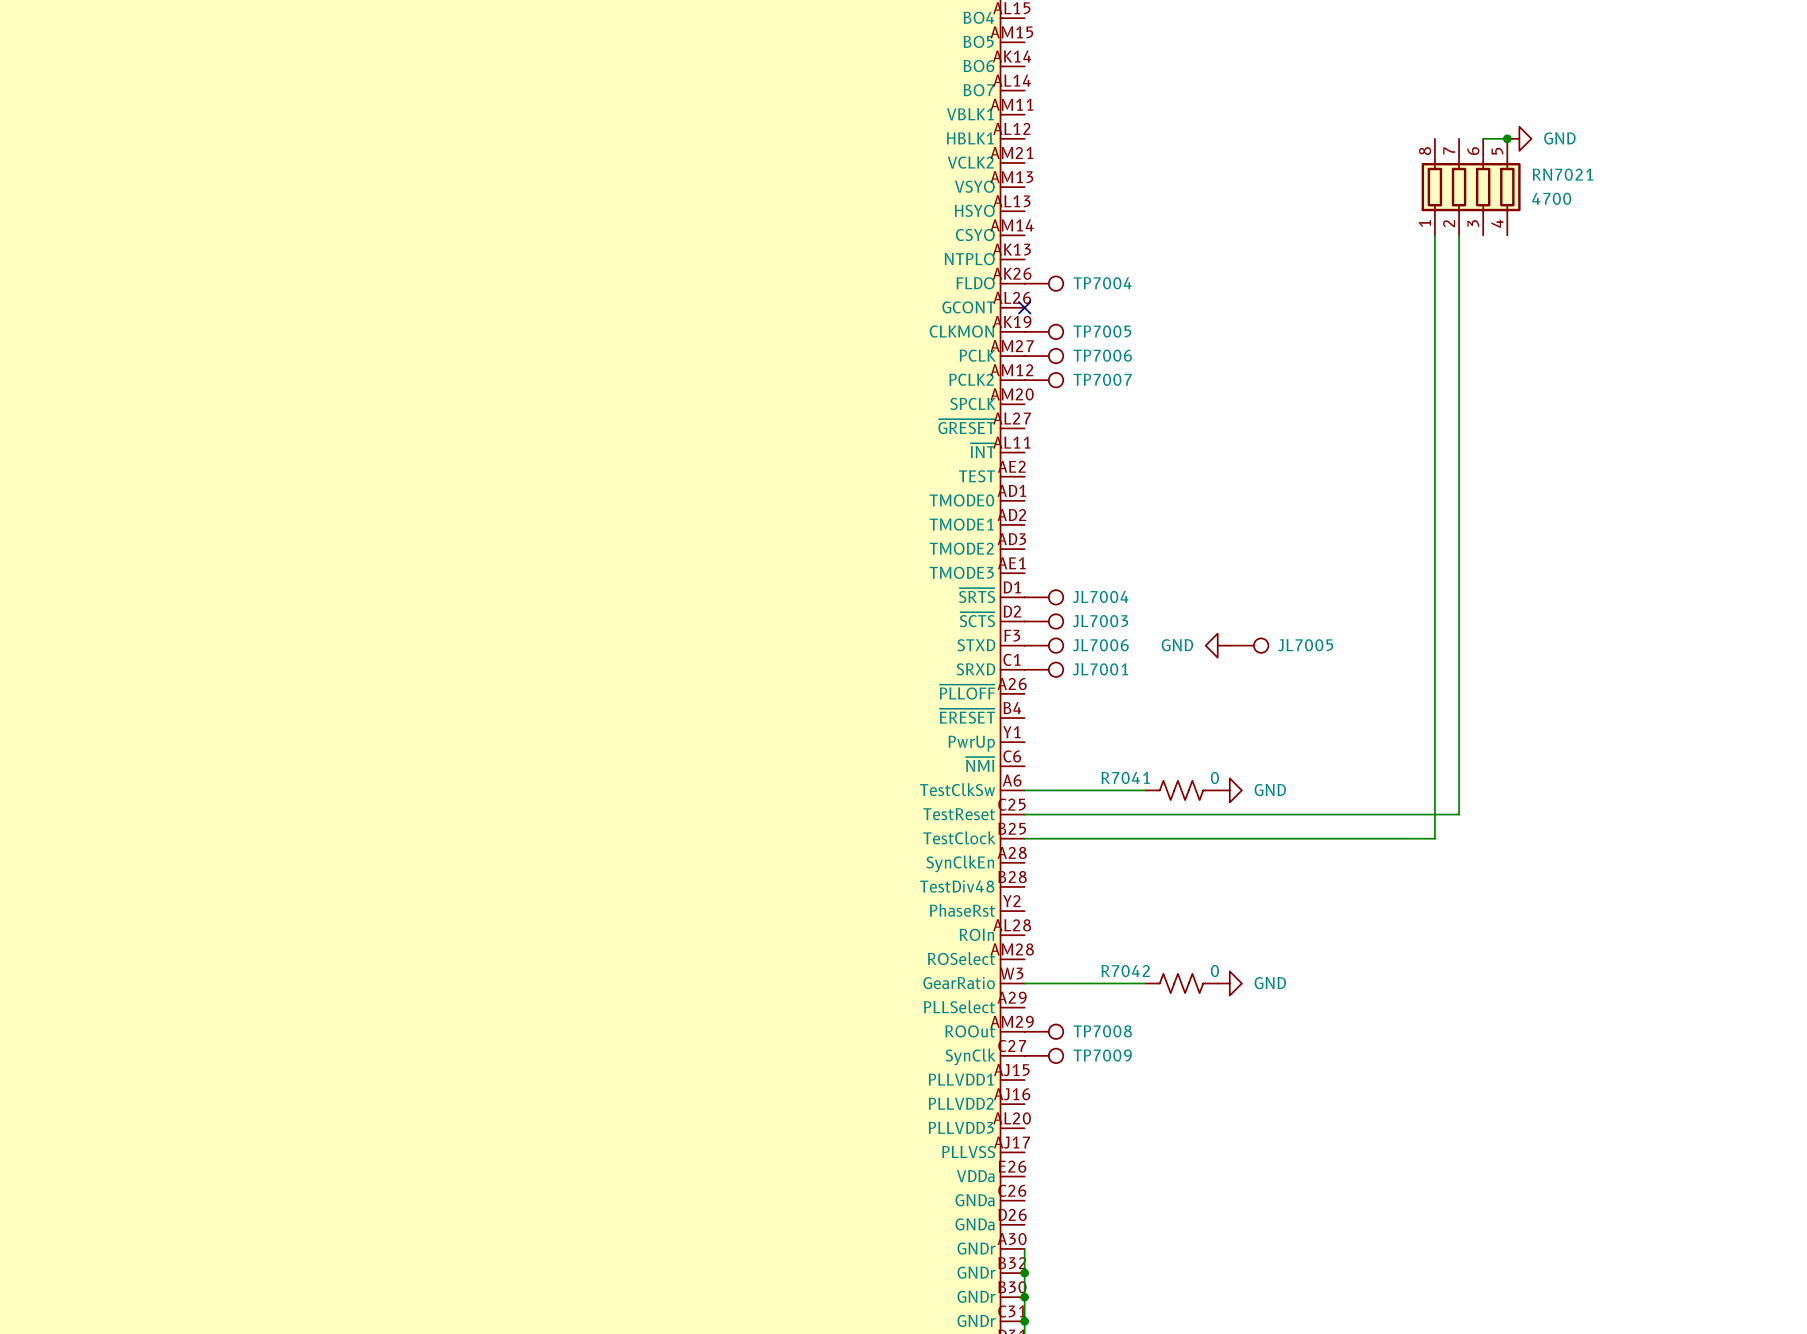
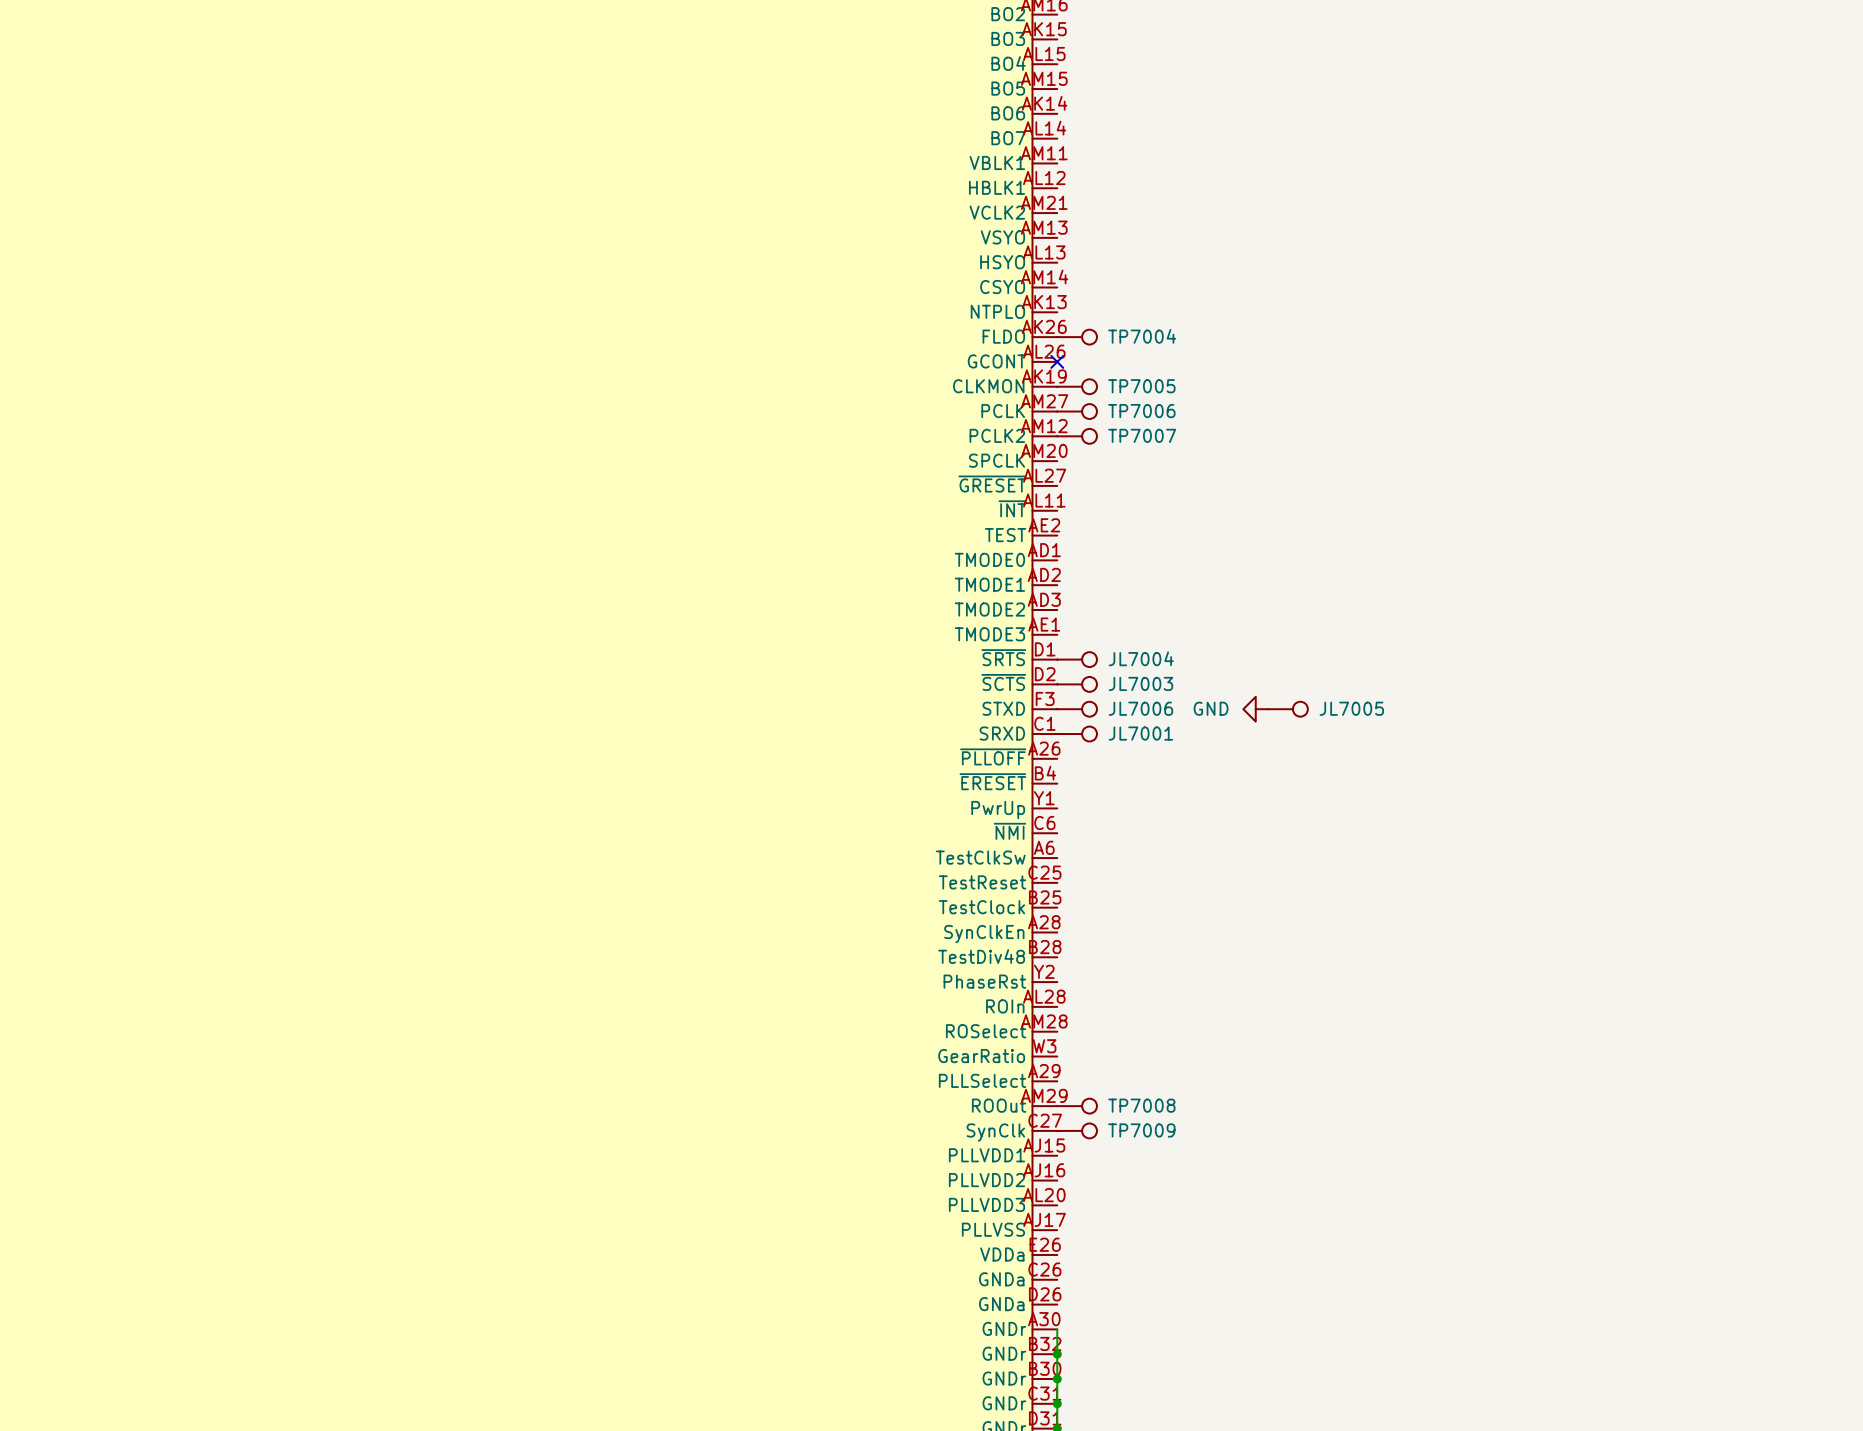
wire: (1483, 138) (1507, 138) -> none
junction: (1507, 138) -> none
power symbol: GND (1519, 138) -> none
RN7021: 4700 (1471, 187) -> none
wire: (1434, 235) (1434, 838) (1024, 838) -> none
wire: (1459, 235) (1459, 814) (1024, 814) -> none
wire: (1024, 790) (1145, 790) -> none
R7041: 0 (1181, 790) -> none
power symbol: GND (1229, 790) -> none
wire: (1024, 983) (1145, 983) -> none
R7042: 0 (1181, 983) -> none
power symbol: GND (1229, 983) -> none

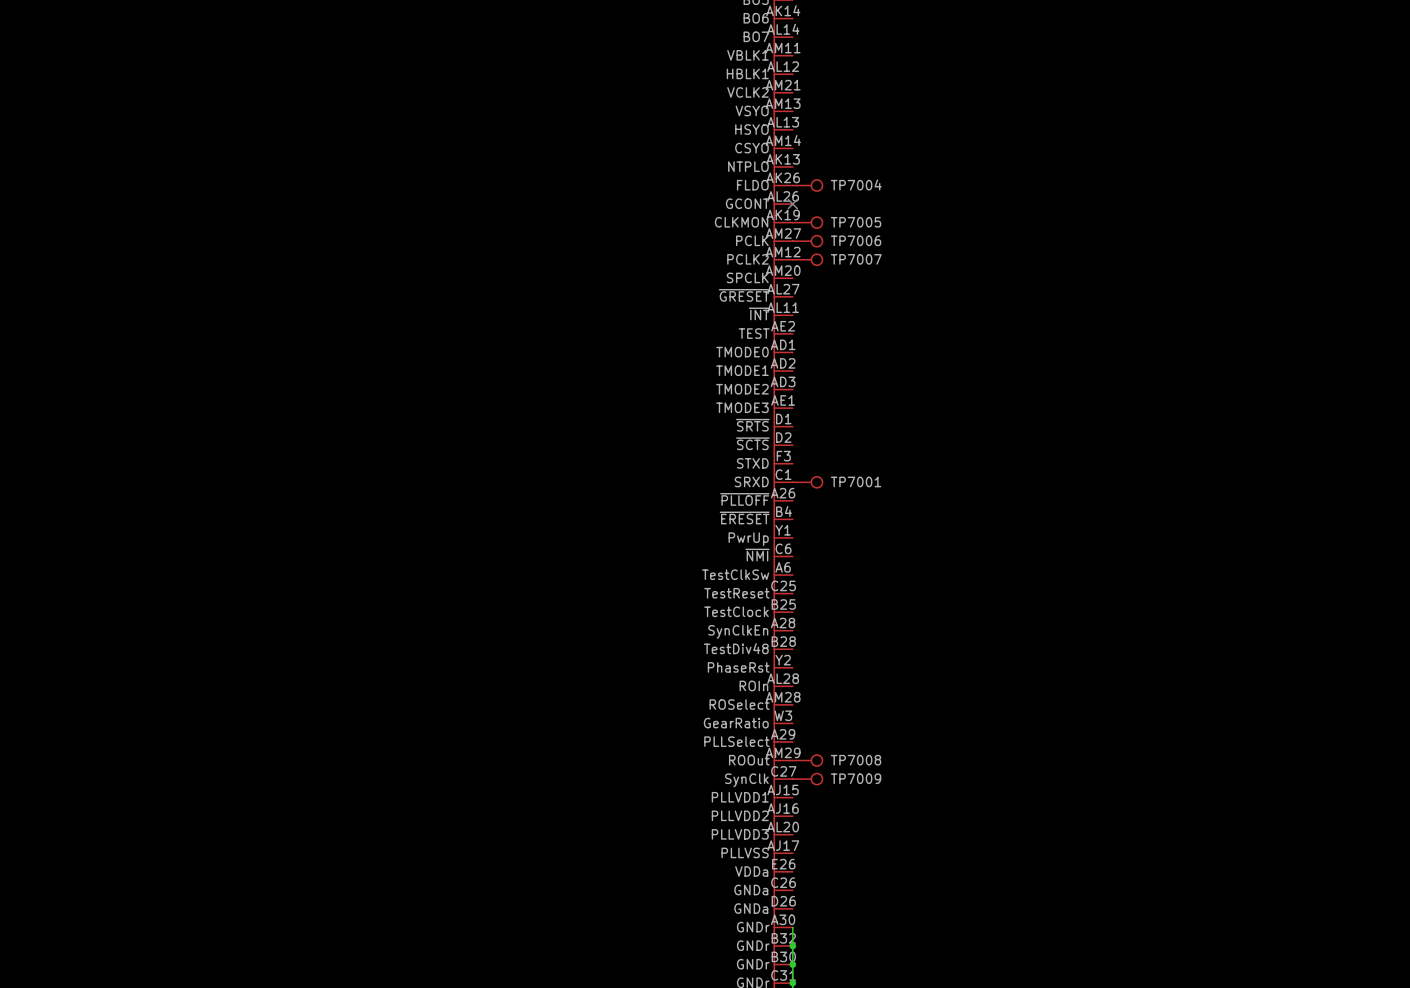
JL7004: (1077, 659) -> none
JL7003: (1077, 684) -> none
JL7006: (1077, 709) -> none
power symbol: GND (1255, 709) -> none
JL7005: (1288, 709) -> none
JL7001 name: JL7001 (1140, 733) -> TP7001 (856, 481)

